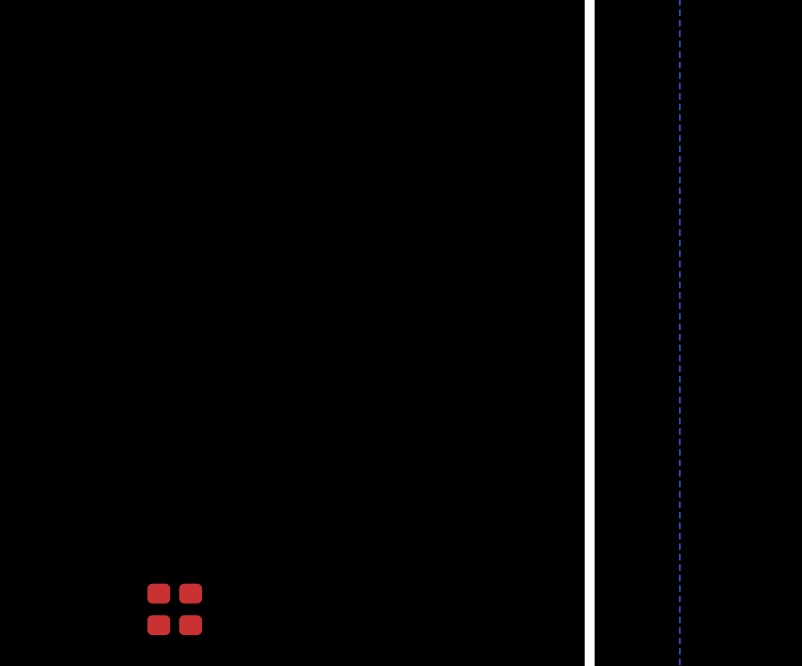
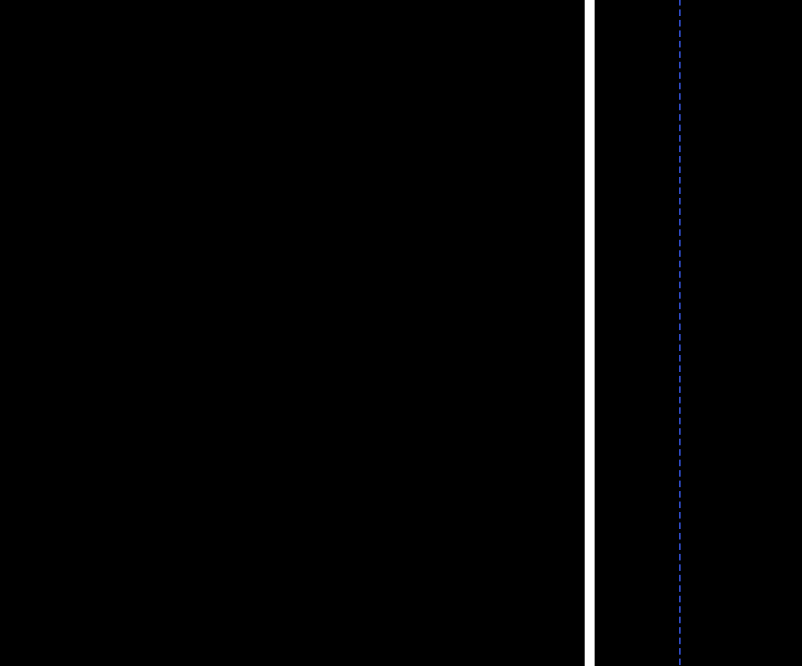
part: (174, 593) -> none
part: (174, 625) -> none

